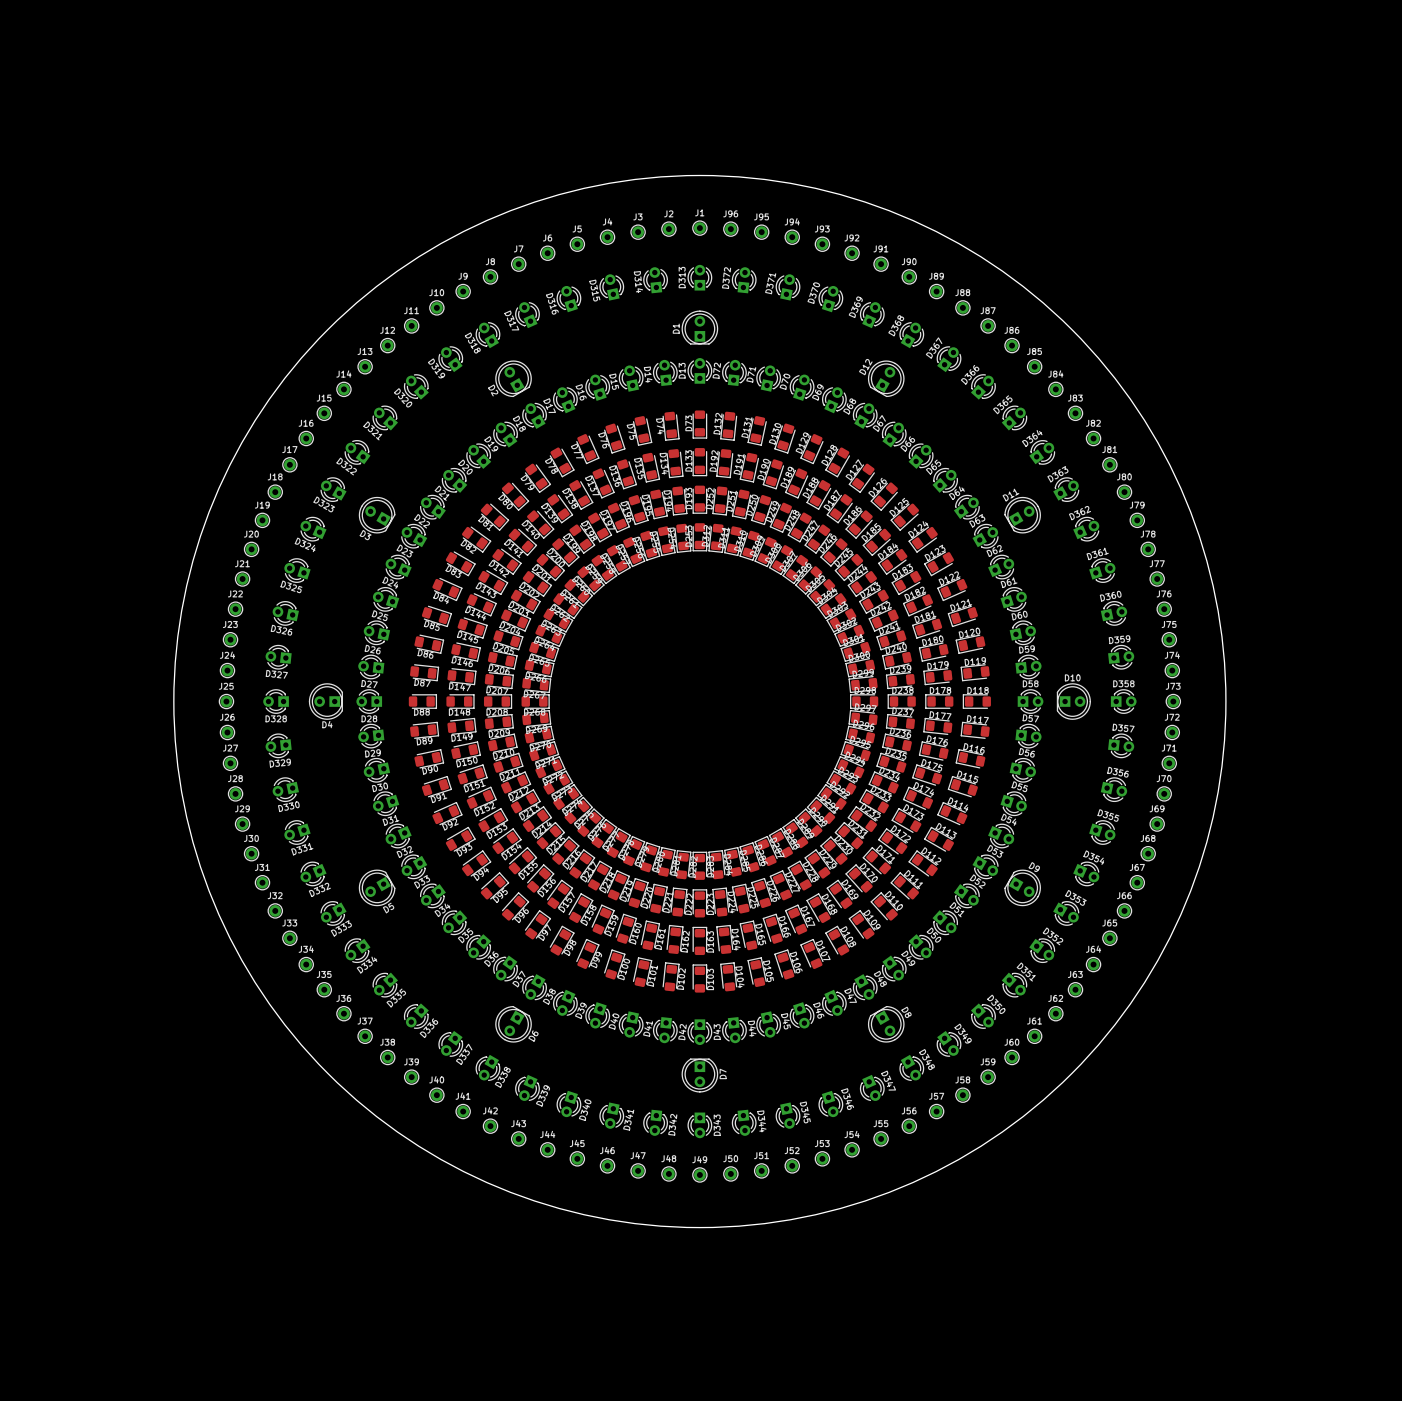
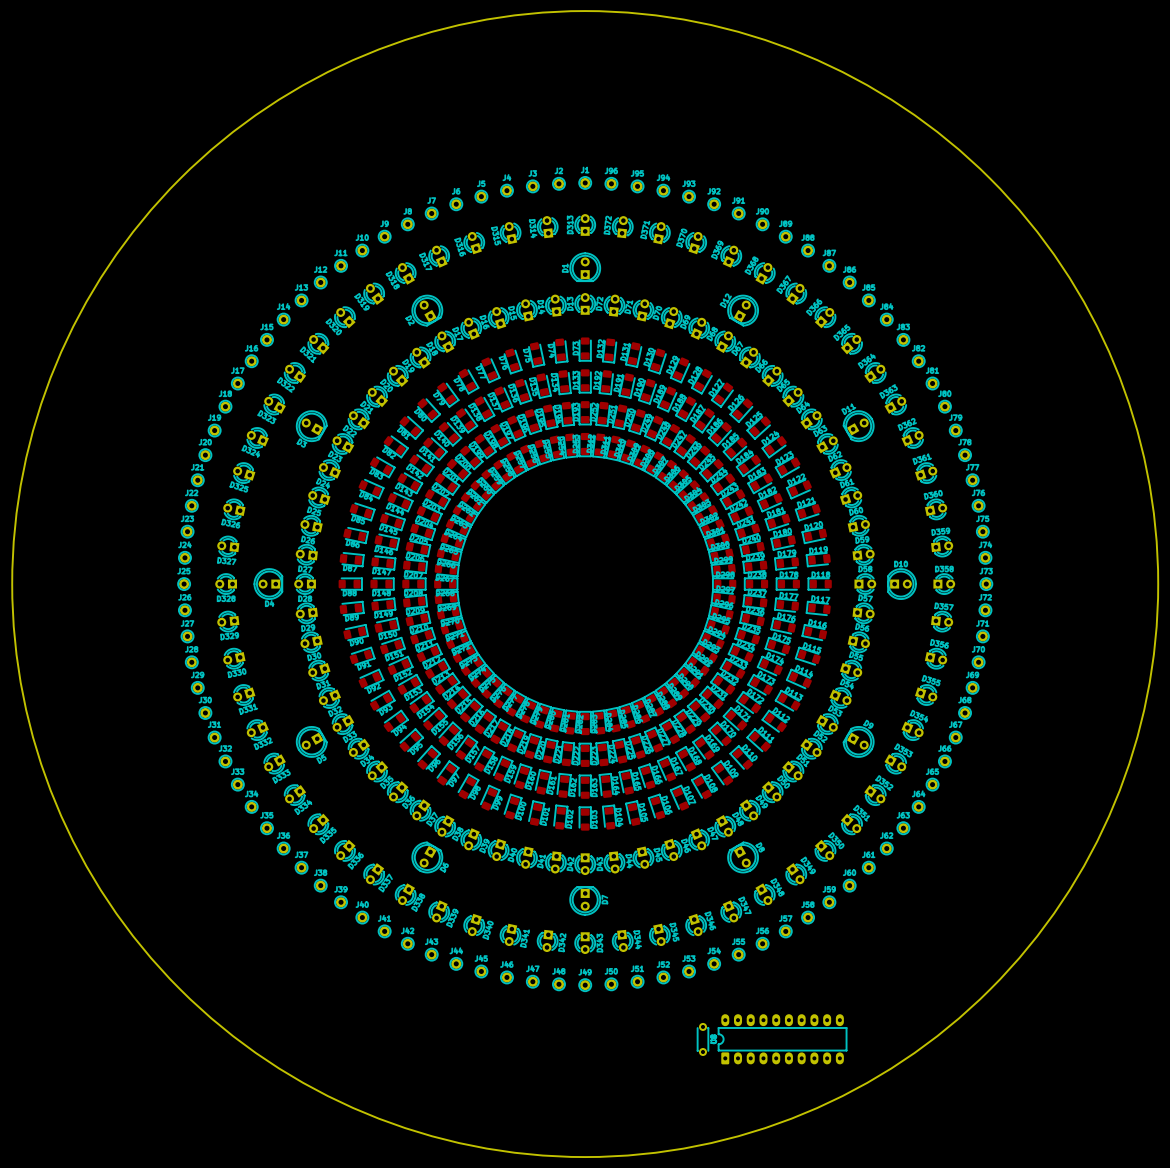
round board edge size: [173, 175, 1227, 1228] -> [12, 10, 1159, 1158]
part: none -> (782, 1039)
part: none -> (702, 1039)

